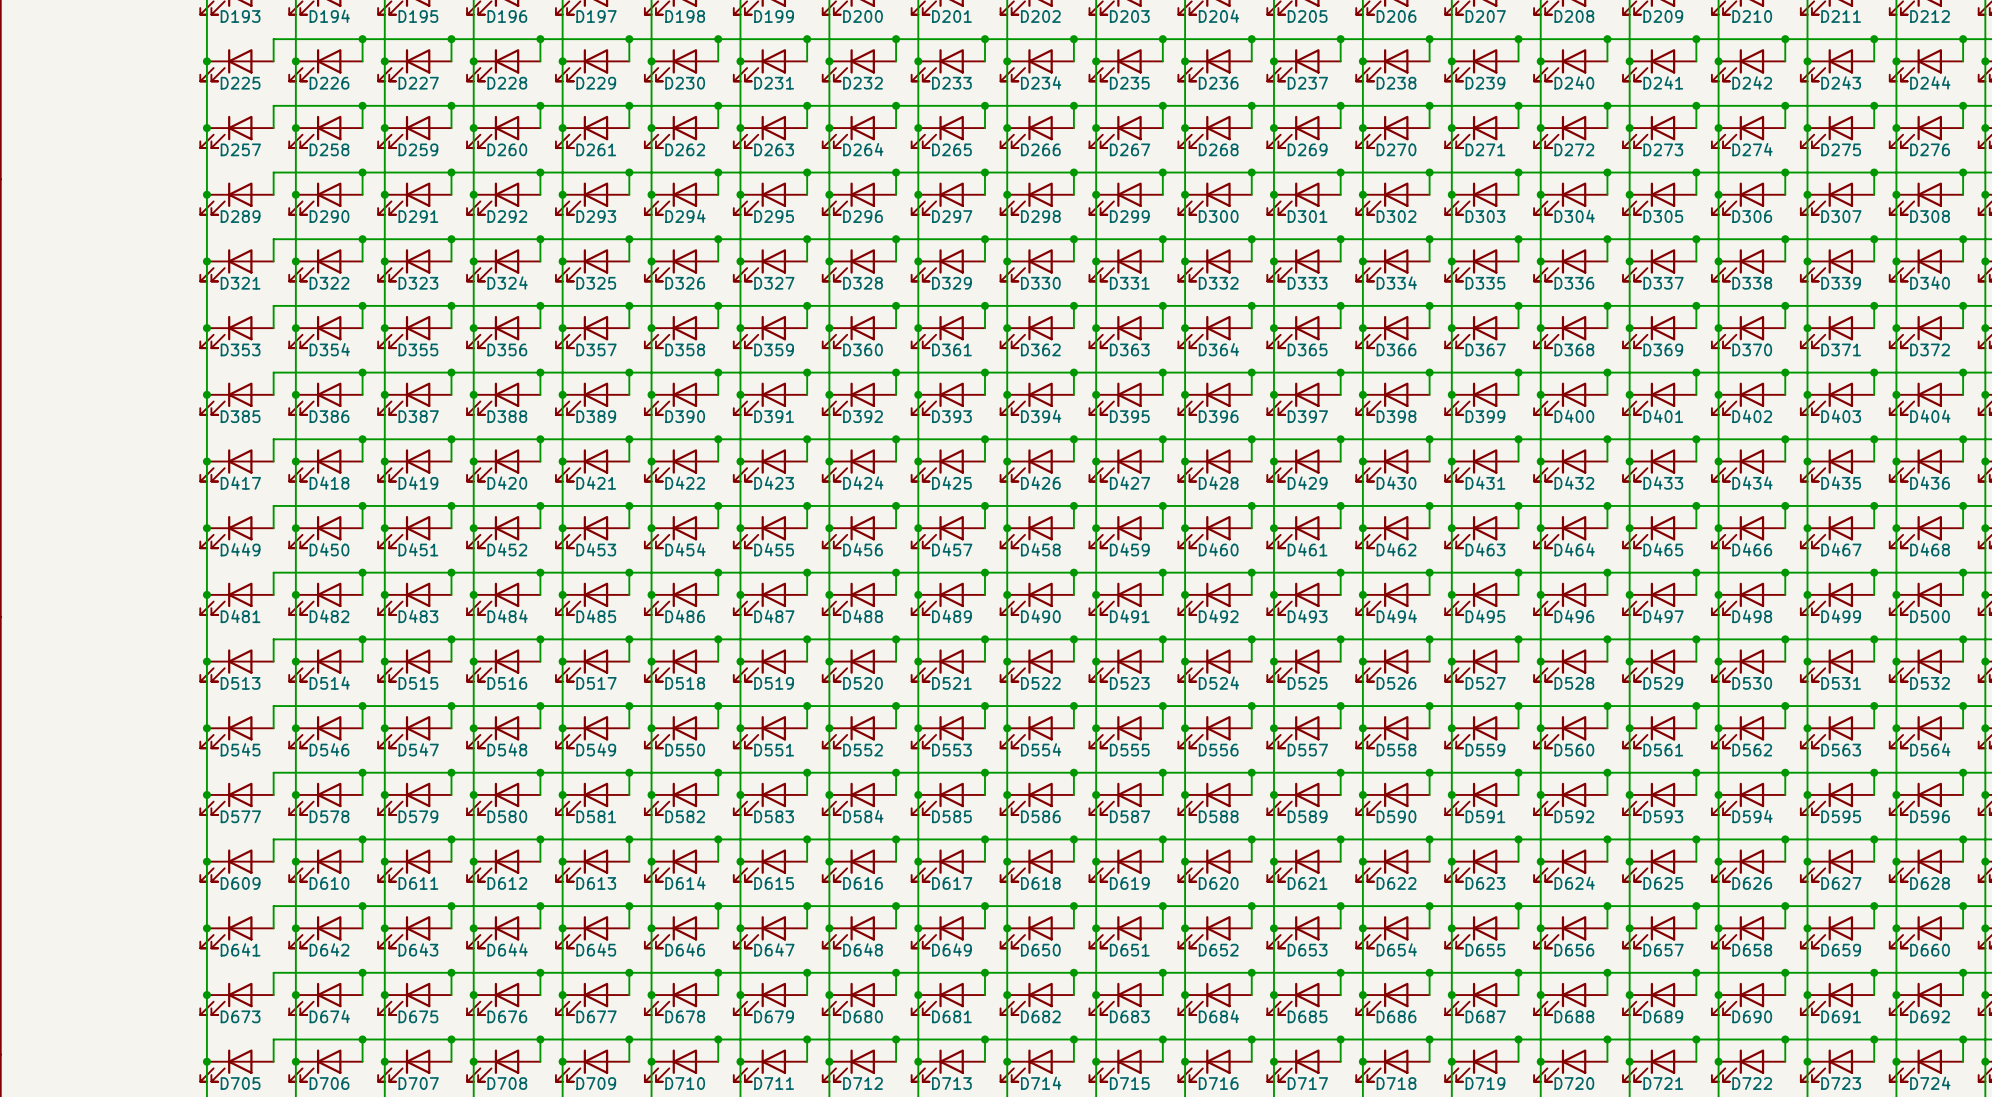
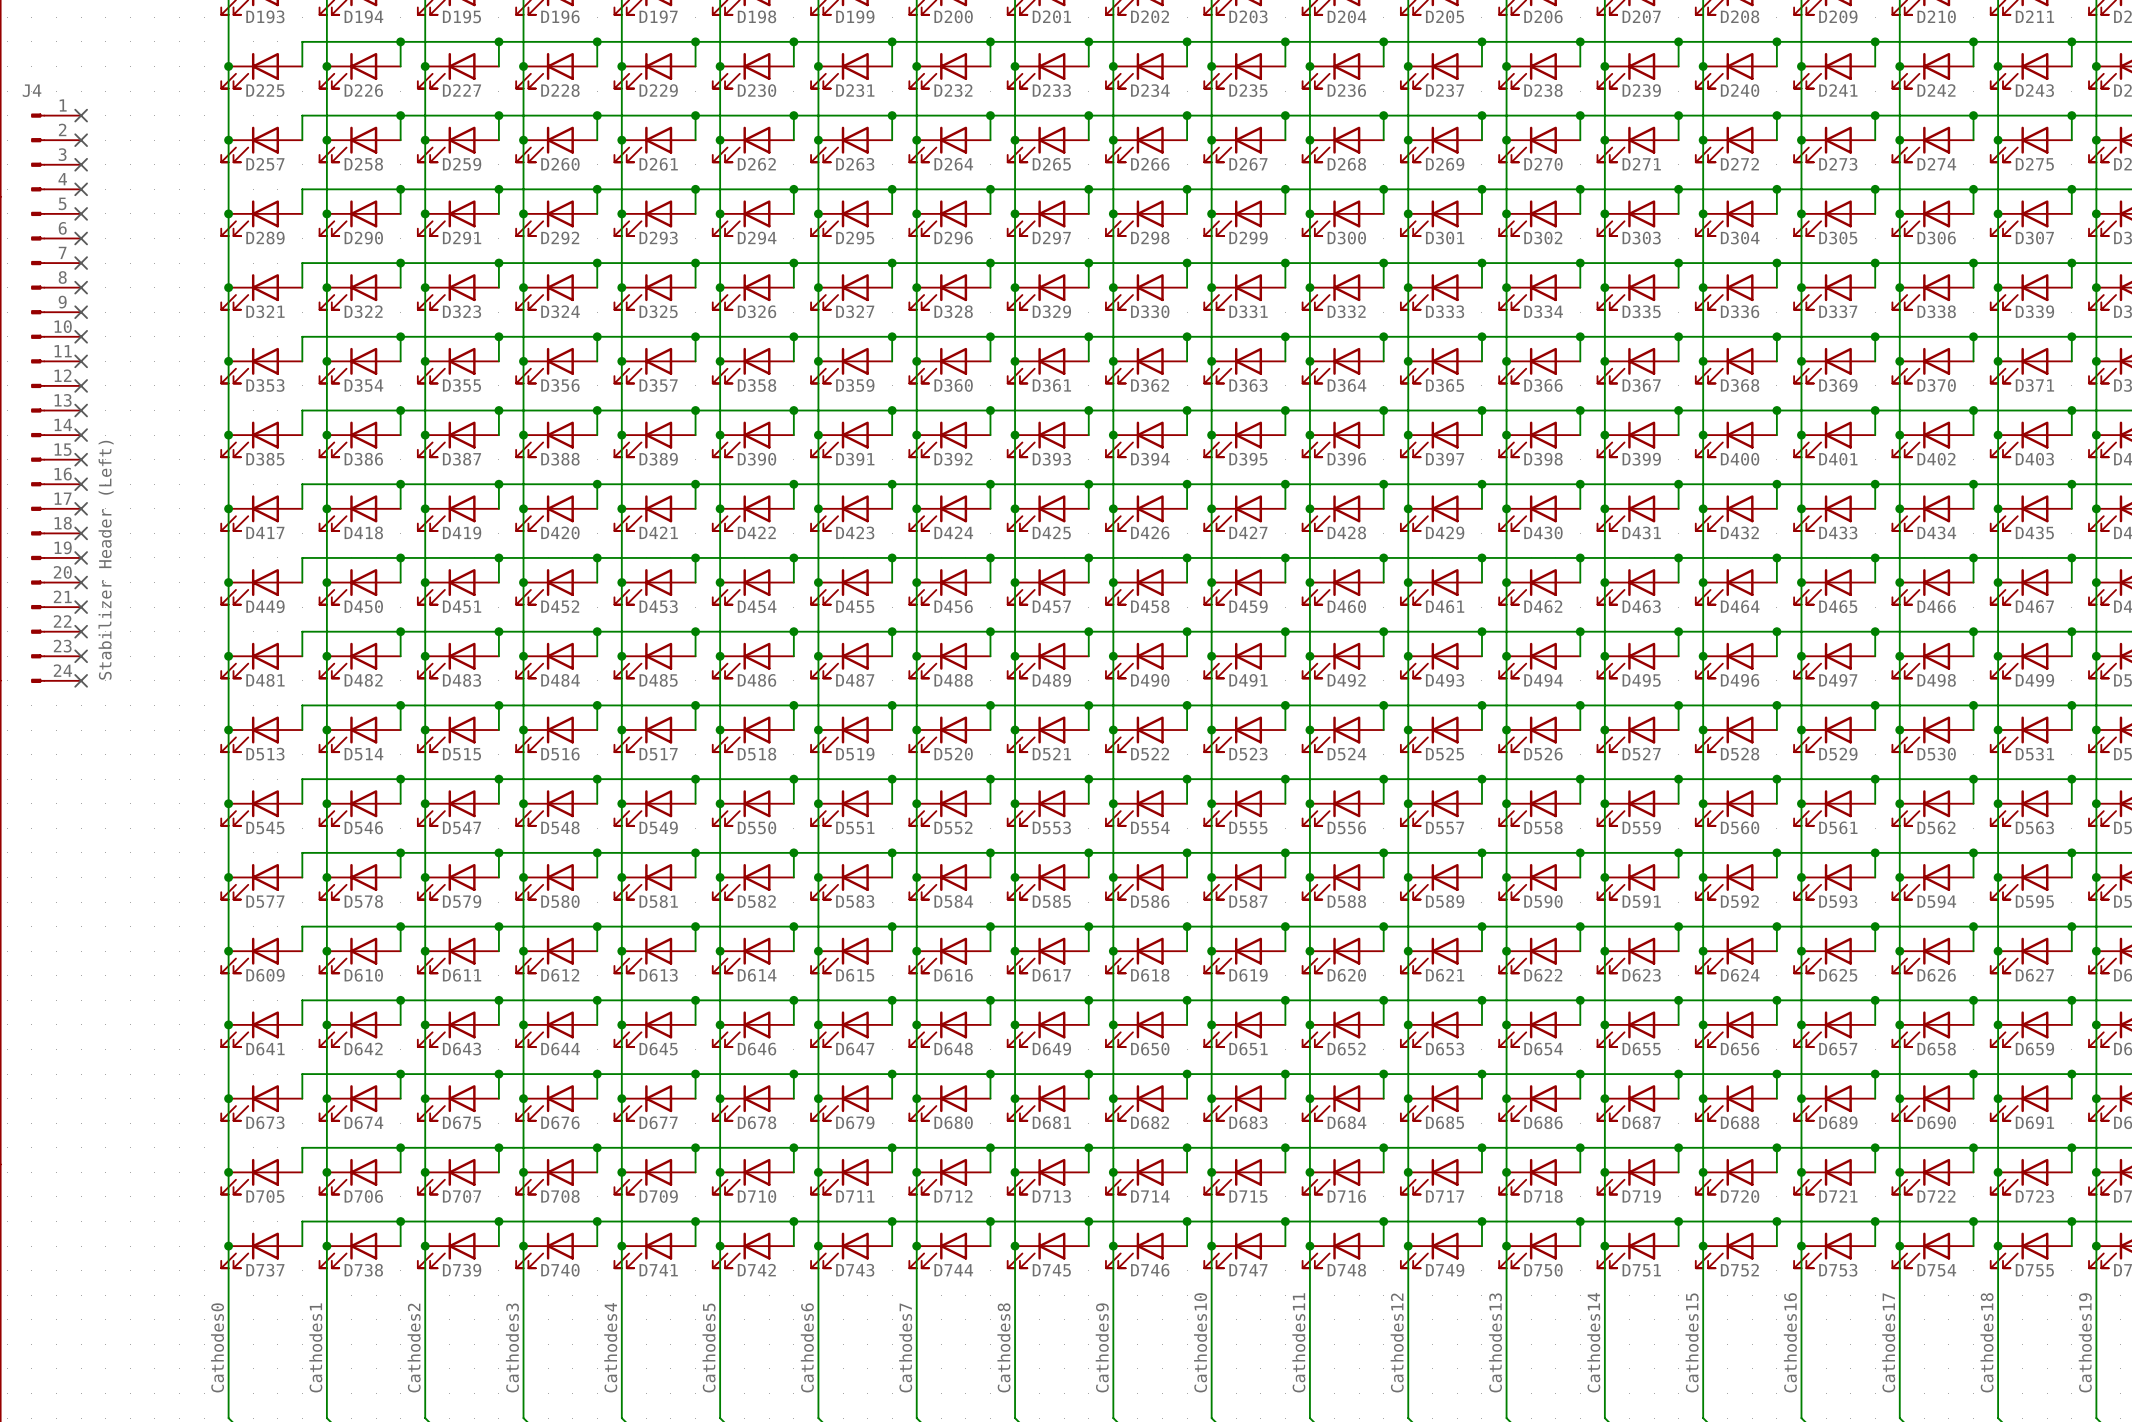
no-connect mark: none -> (81, 115)
no-connect mark: none -> (81, 140)
no-connect mark: none -> (81, 164)
no-connect mark: none -> (81, 189)
no-connect mark: none -> (81, 213)
no-connect mark: none -> (81, 238)
no-connect mark: none -> (81, 263)
no-connect mark: none -> (81, 287)
no-connect mark: none -> (81, 312)
no-connect mark: none -> (81, 336)
no-connect mark: none -> (81, 361)
no-connect mark: none -> (81, 385)
J4: none -> Stabilizer Header (Left) (56, 398)
no-connect mark: none -> (81, 410)
no-connect mark: none -> (81, 435)
no-connect mark: none -> (81, 459)
no-connect mark: none -> (81, 484)
no-connect mark: none -> (81, 508)
no-connect mark: none -> (81, 533)
no-connect mark: none -> (81, 557)
no-connect mark: none -> (81, 582)
no-connect mark: none -> (81, 607)
no-connect mark: none -> (81, 631)
no-connect mark: none -> (81, 656)
no-connect mark: none -> (81, 680)

